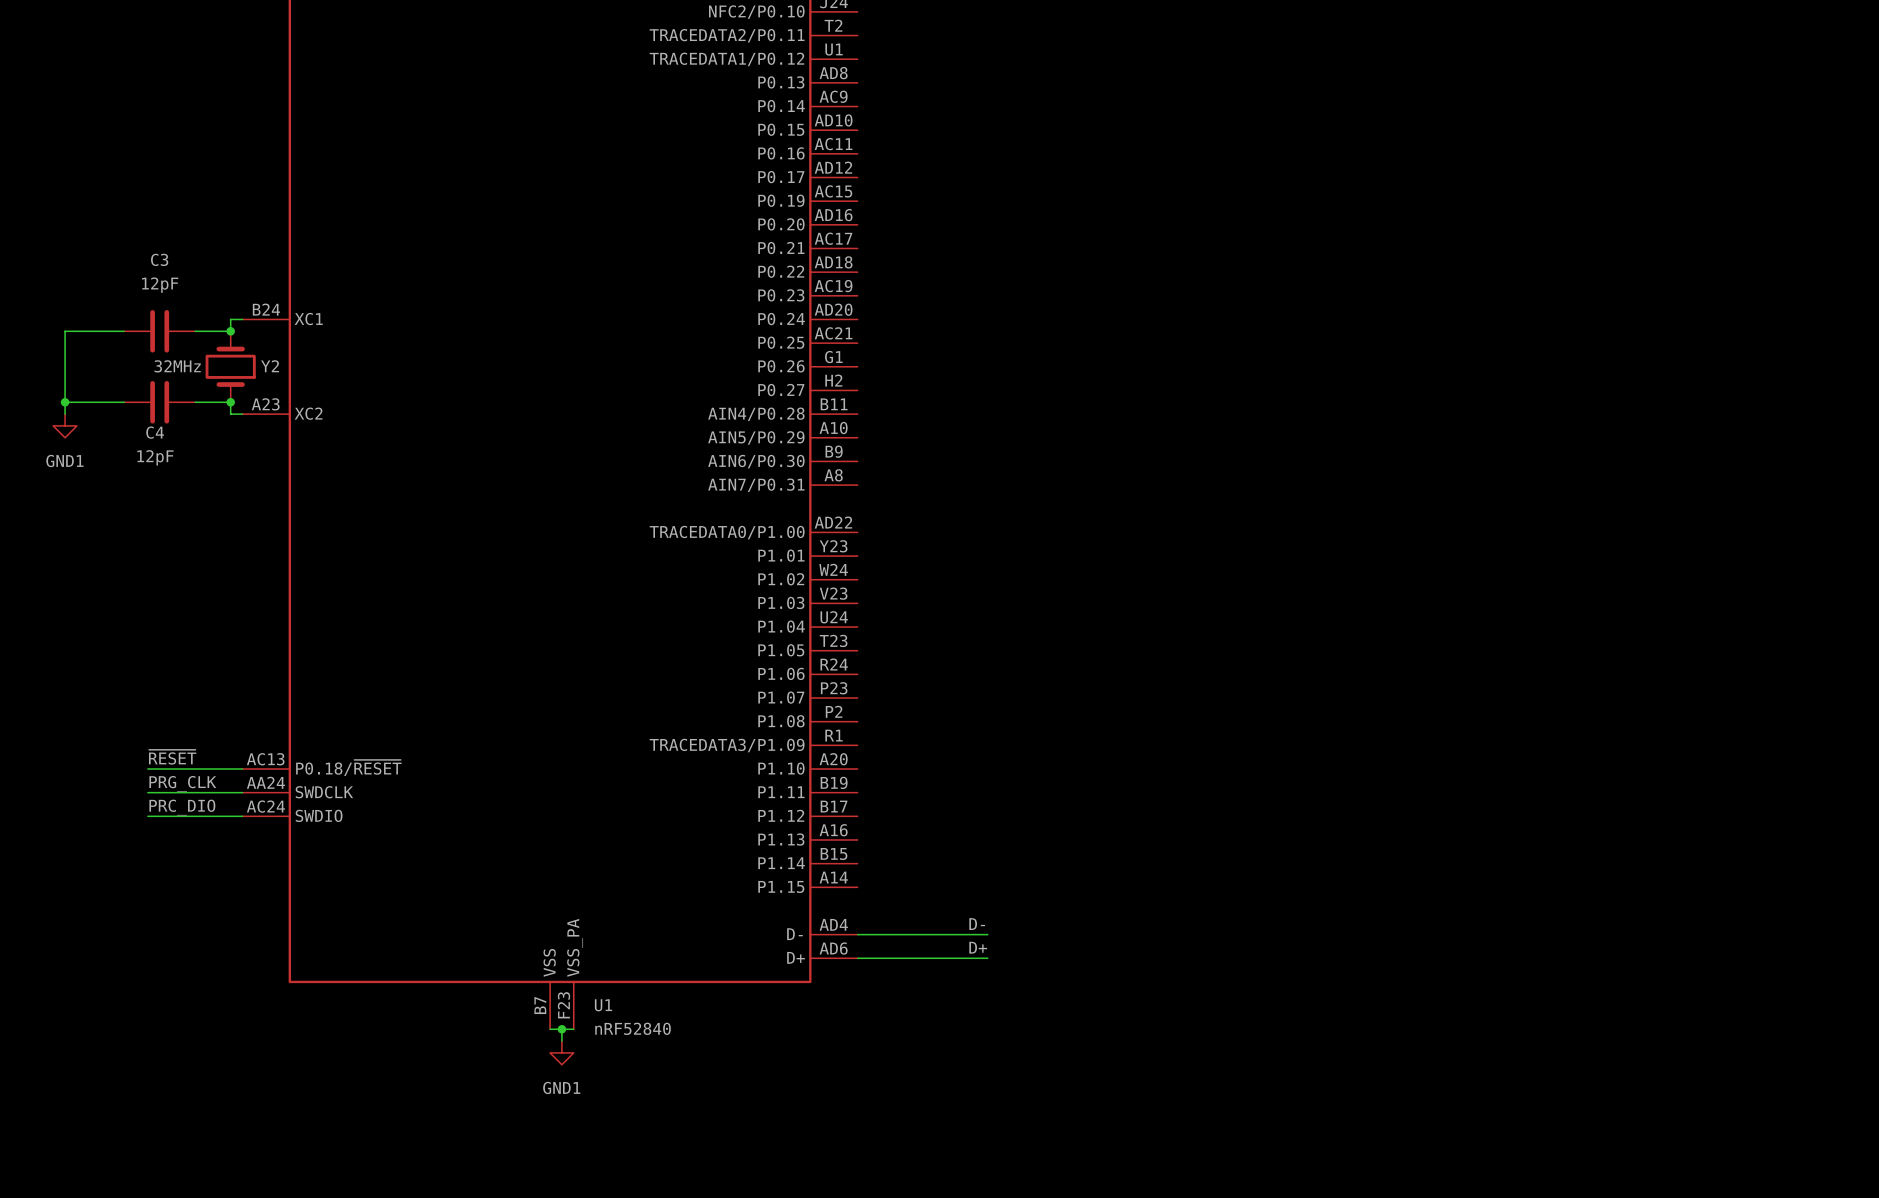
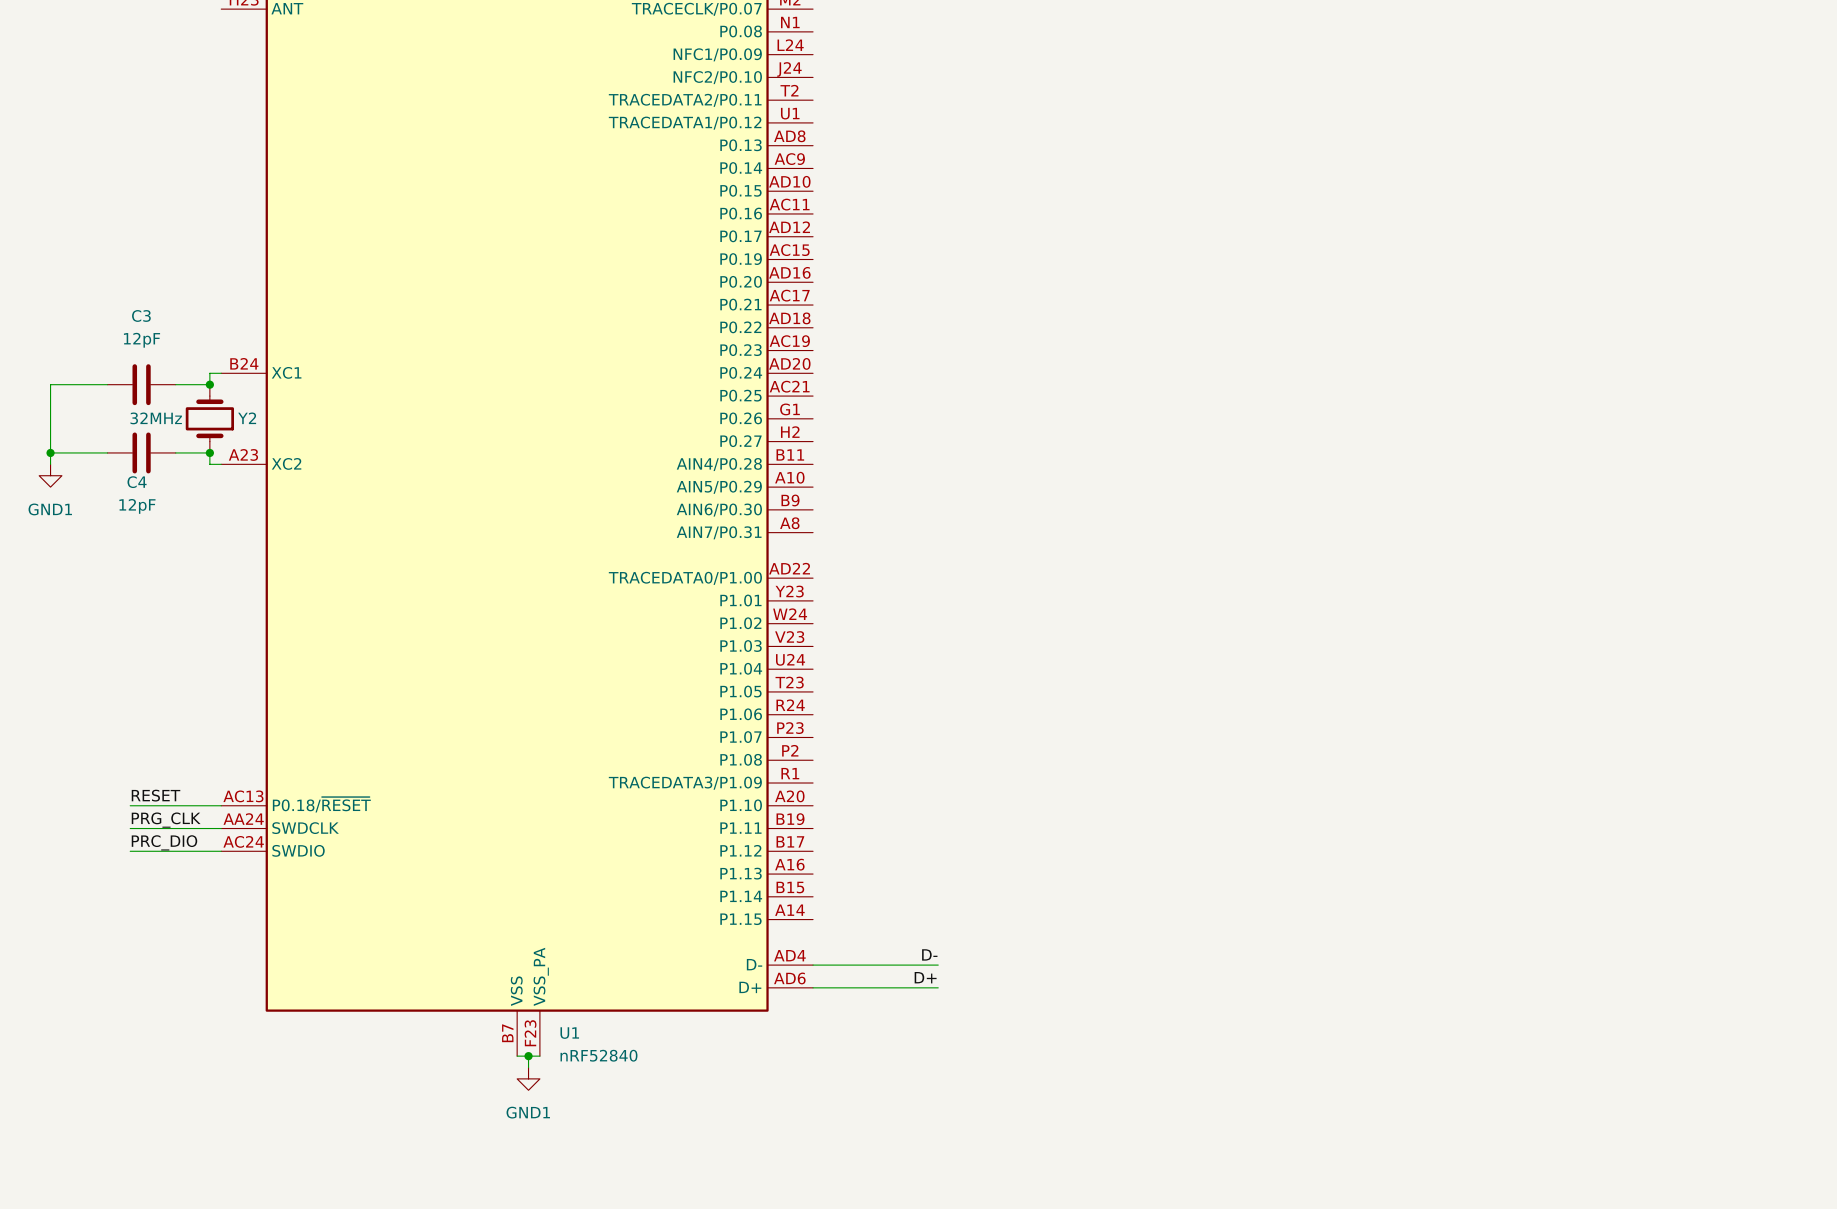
label: ~{RESET} (172, 757) -> RESET (156, 795)

